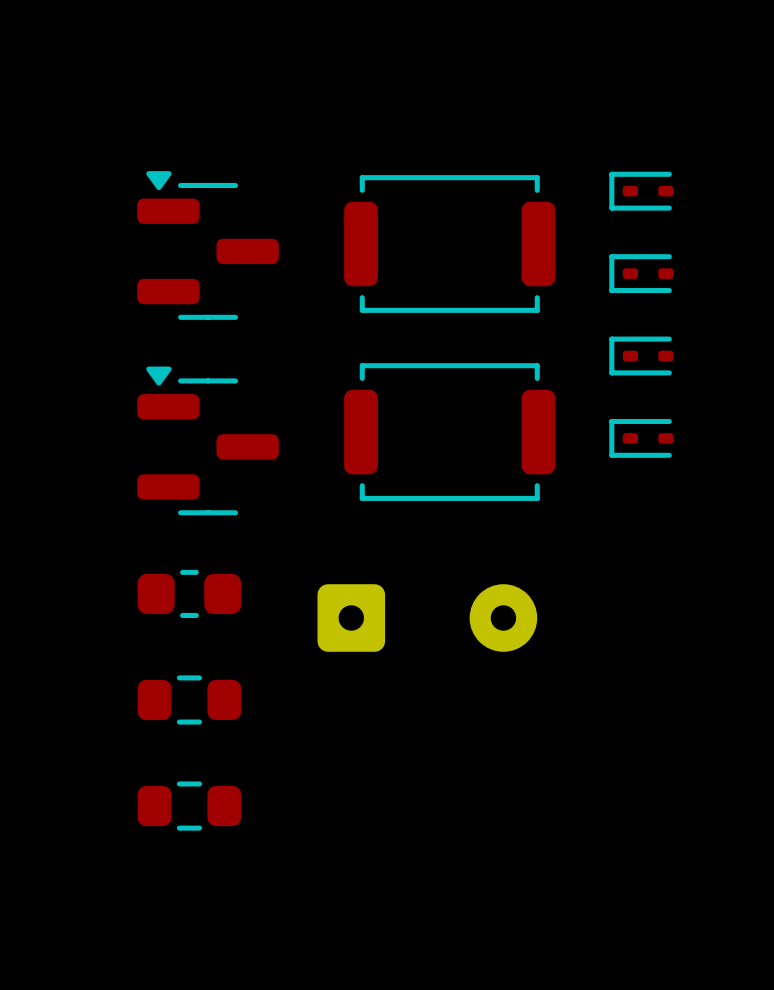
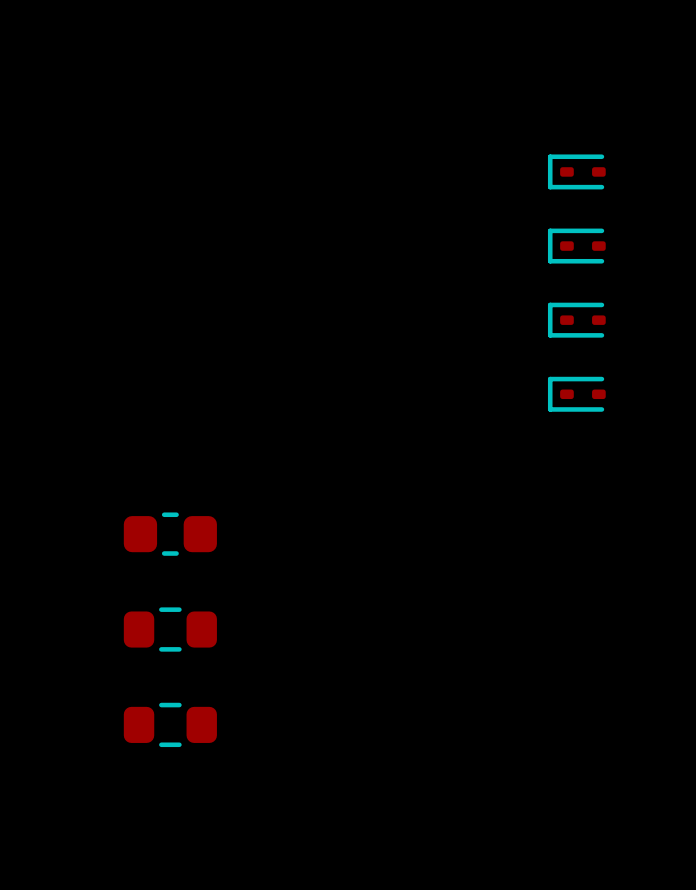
part: (449, 244) -> none
part: (208, 245) -> none
part: (449, 432) -> none
part: (208, 440) -> none
part: (427, 618) -> none

